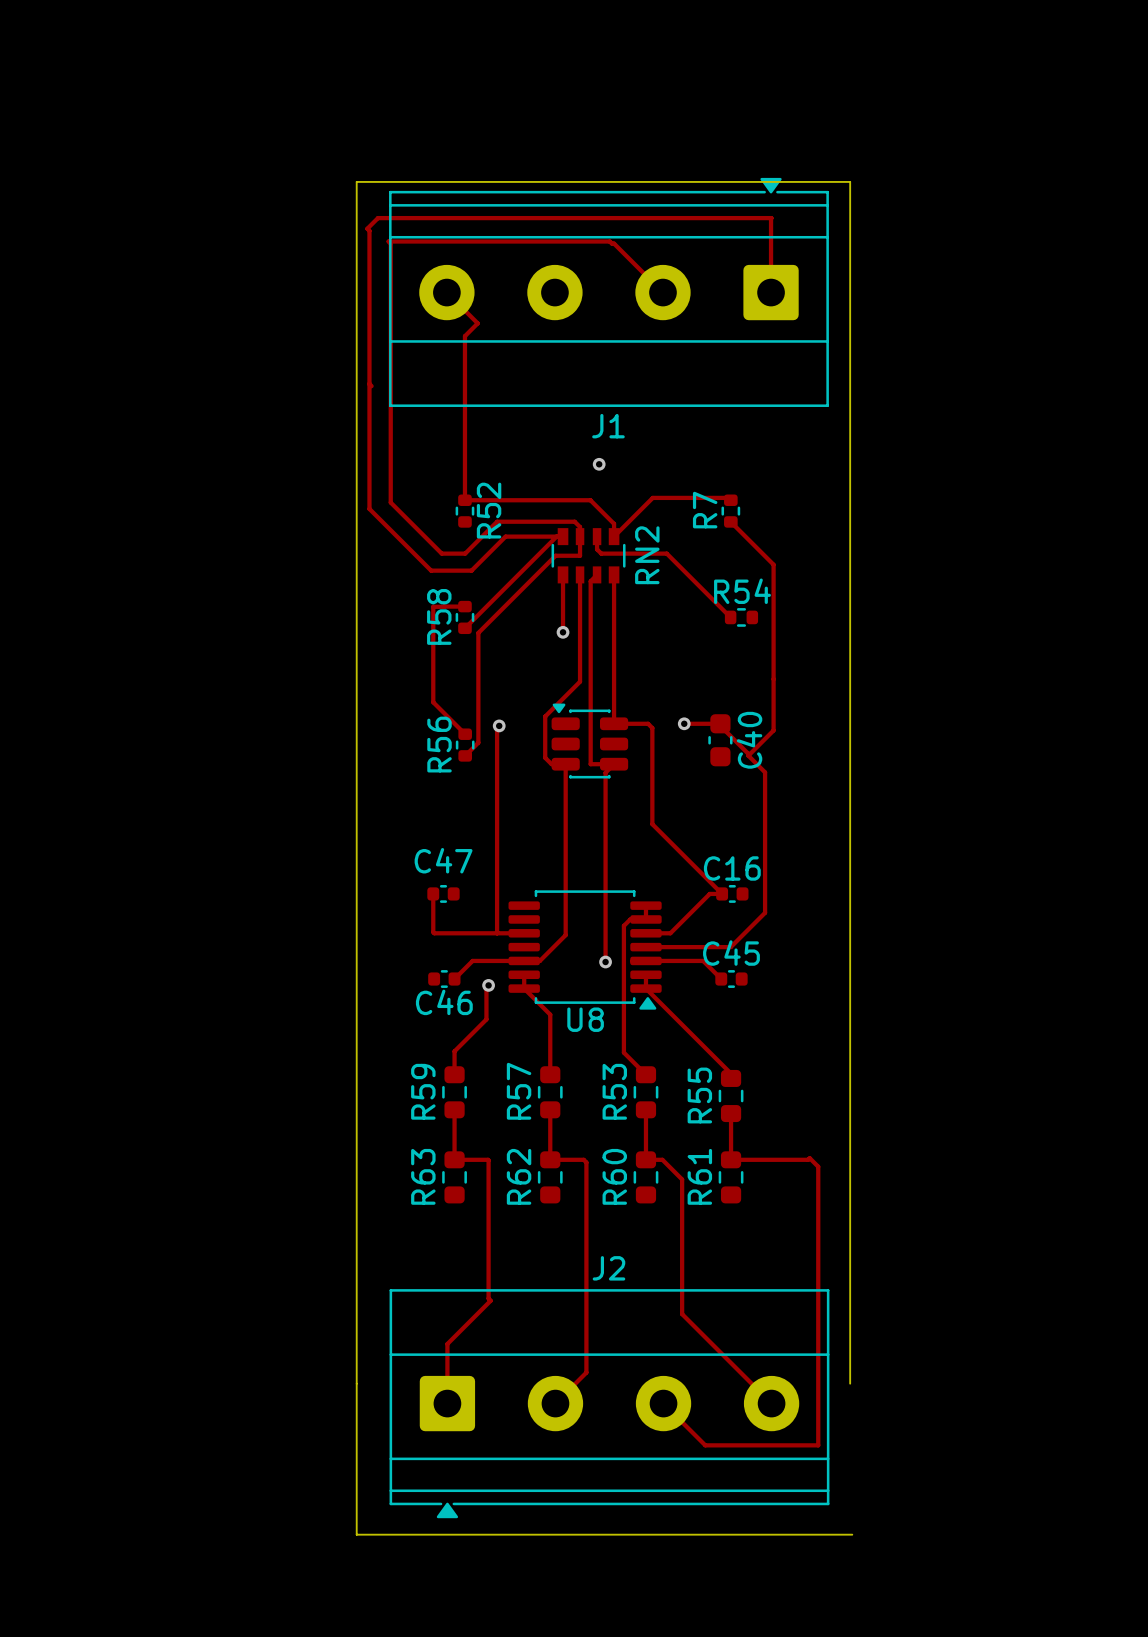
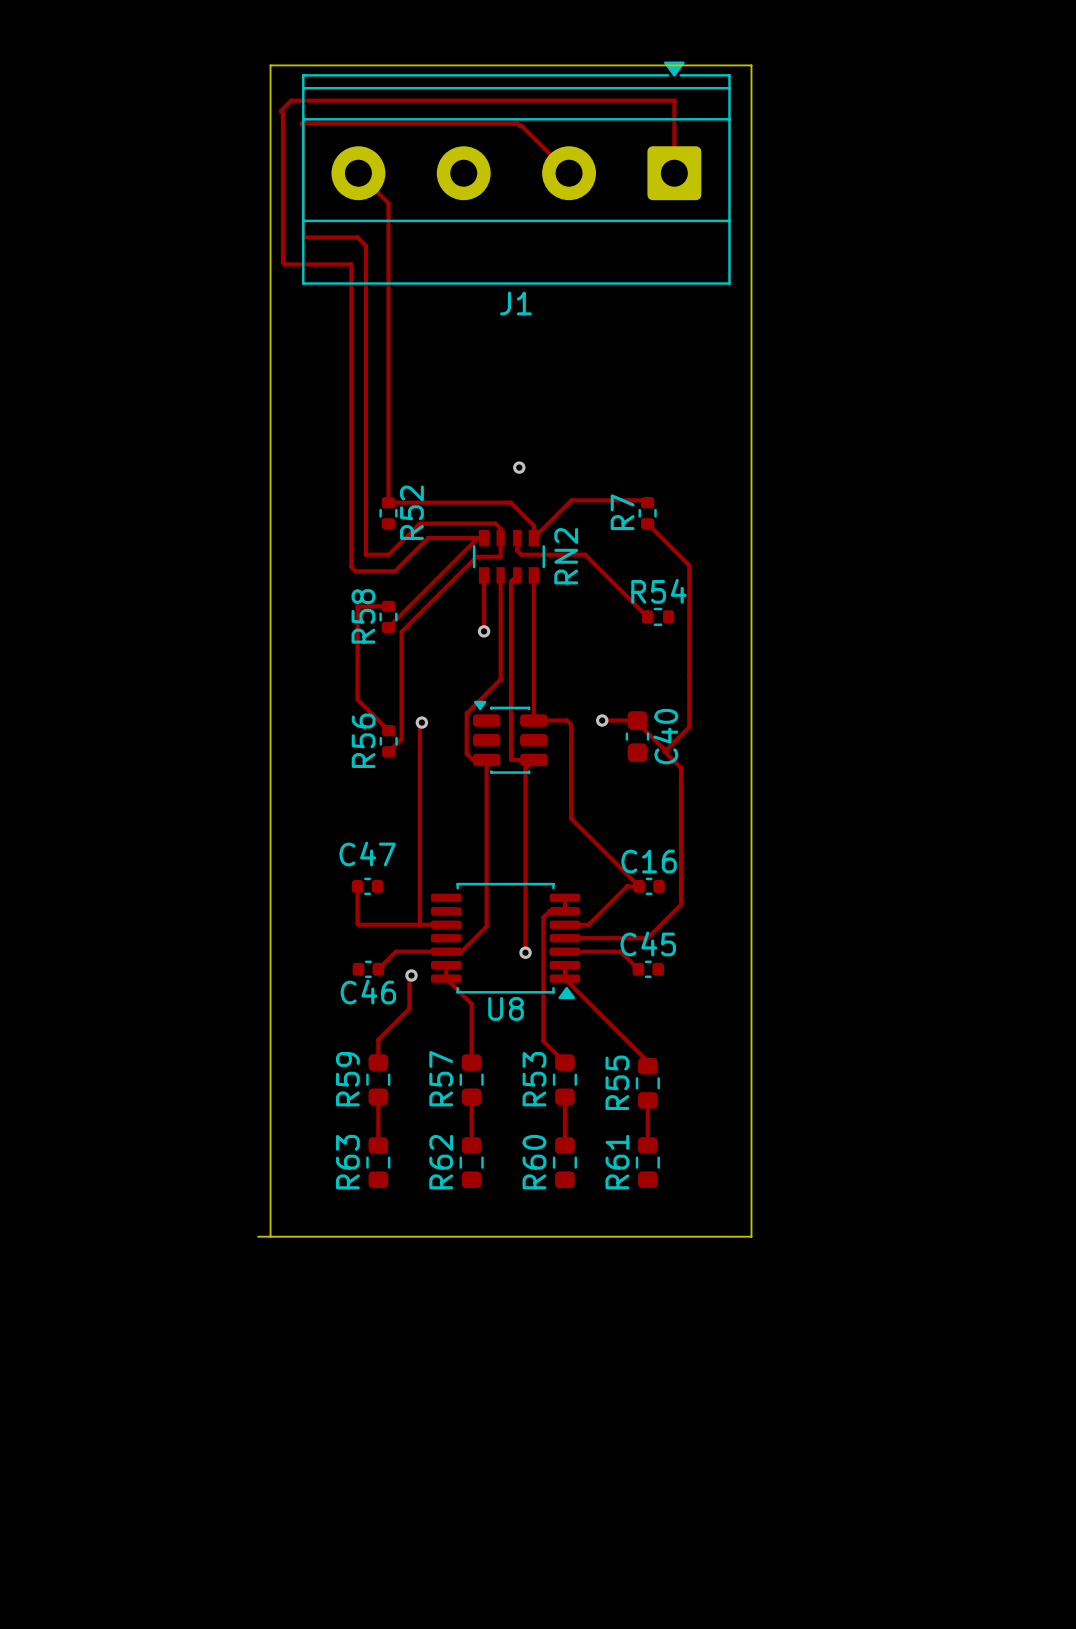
track: (446, 292) (477, 323) (464, 336) -> (358, 173) (388, 203) (388, 342)
J1 position: (608, 292) -> (516, 173)
track: (662, 292) (609, 241) (388, 241) (390, 243) (390, 502) (441, 553) -> (569, 173) (517, 123) (301, 123) (303, 125) (303, 237) (357, 237) (365, 245) (365, 554)
track: (771, 292) (771, 218) (377, 218) (367, 228) (369, 230) (369, 508) (426, 566) -> (674, 173) (674, 100) (291, 100) (280, 111) (282, 113) (282, 262) (285, 264) (351, 264) (351, 567)
track: (369, 384) (371, 386) -> none
track: (454, 1159) (488, 1160) (488, 1298) (490, 1300) (447, 1344) (447, 1403) -> none
track: (550, 1159) (583, 1159) (586, 1162) (586, 1372) (555, 1403) -> none
track: (645, 1159) (662, 1159) (682, 1179) (682, 1314) (771, 1403) -> none
track: (731, 1159) (808, 1159) (809, 1158) (818, 1166) (818, 1445) (705, 1445) (663, 1403) -> none
board edge: none -> (258, 1236) (751, 1236) (751, 65) (270, 65) (270, 1236)
board edge: (850, 1383) (850, 181) (356, 181) (356, 1534) (852, 1534) -> none
J2: (609, 1403) -> none

